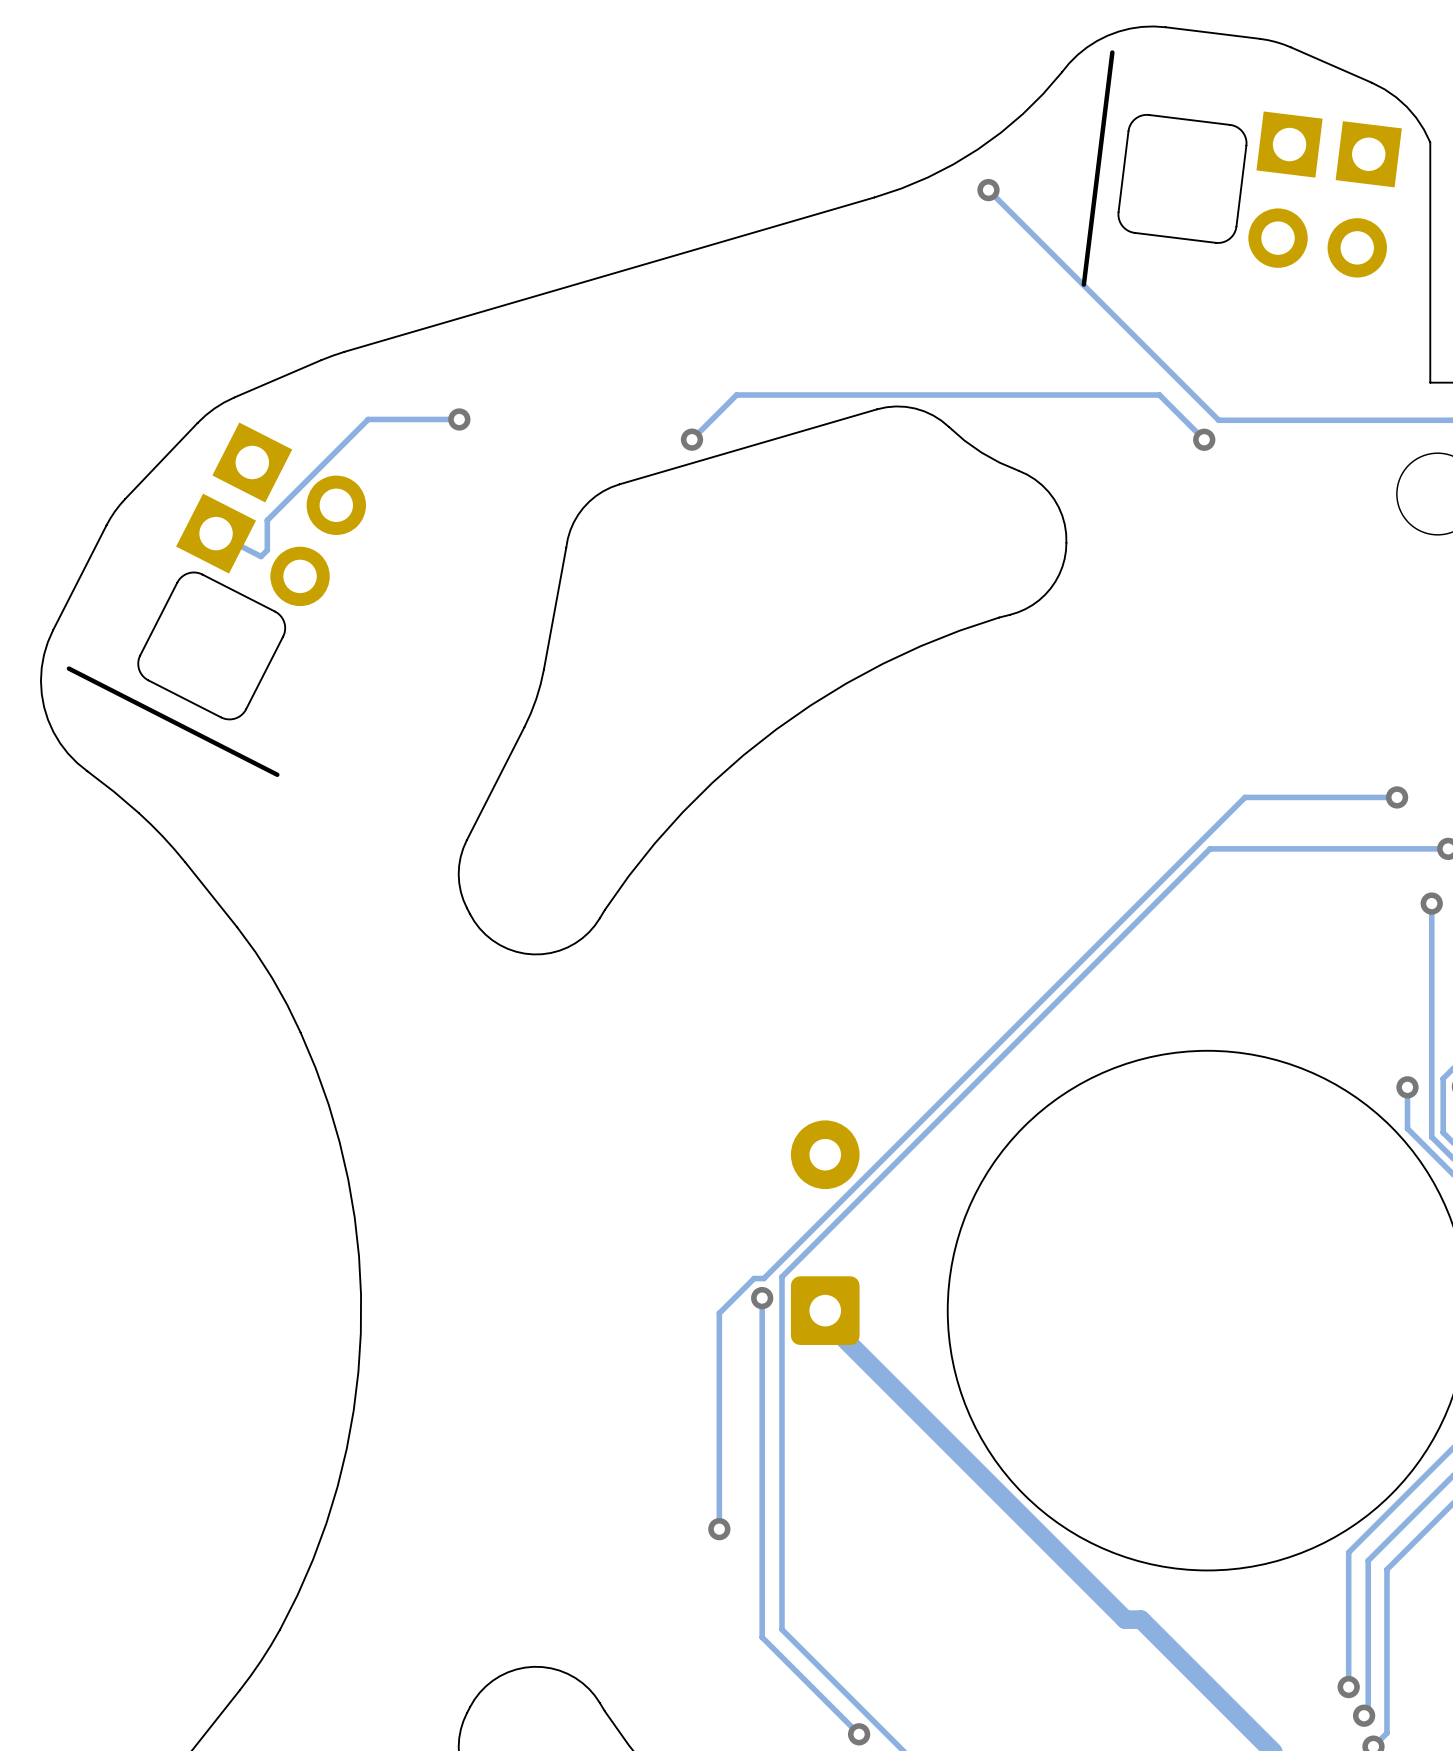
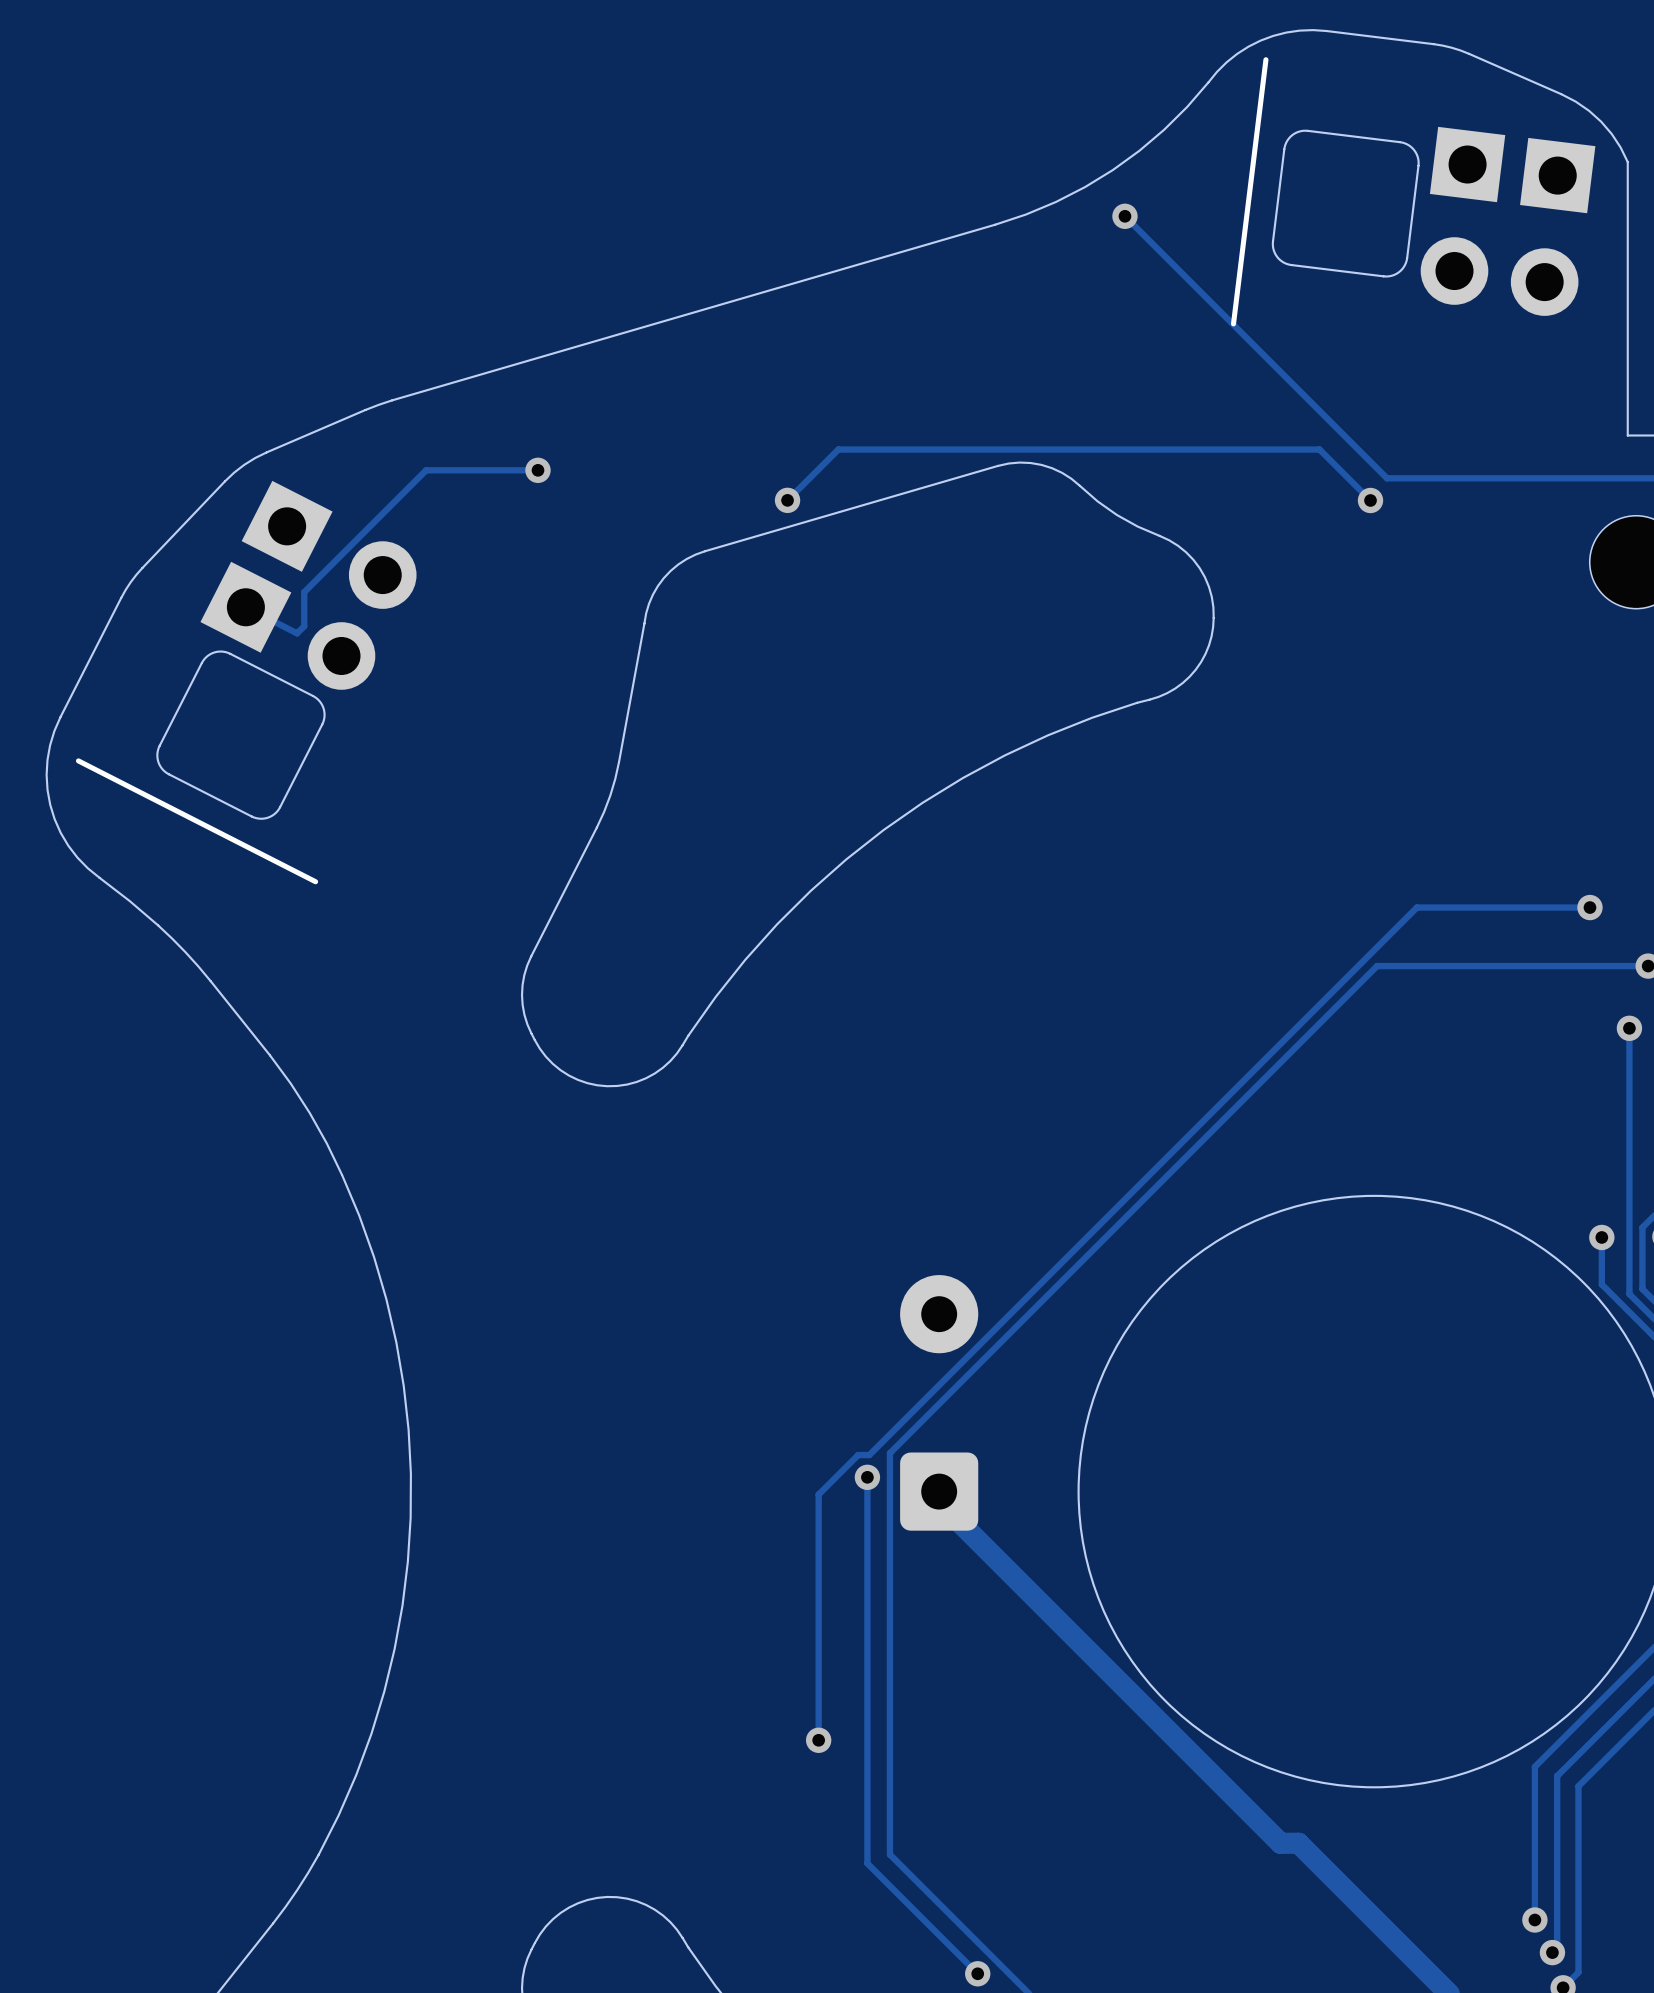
track: (459, 419) (368, 419) -> (537, 470) (426, 470) (419, 477)
via position: (459, 419) -> (537, 470)

